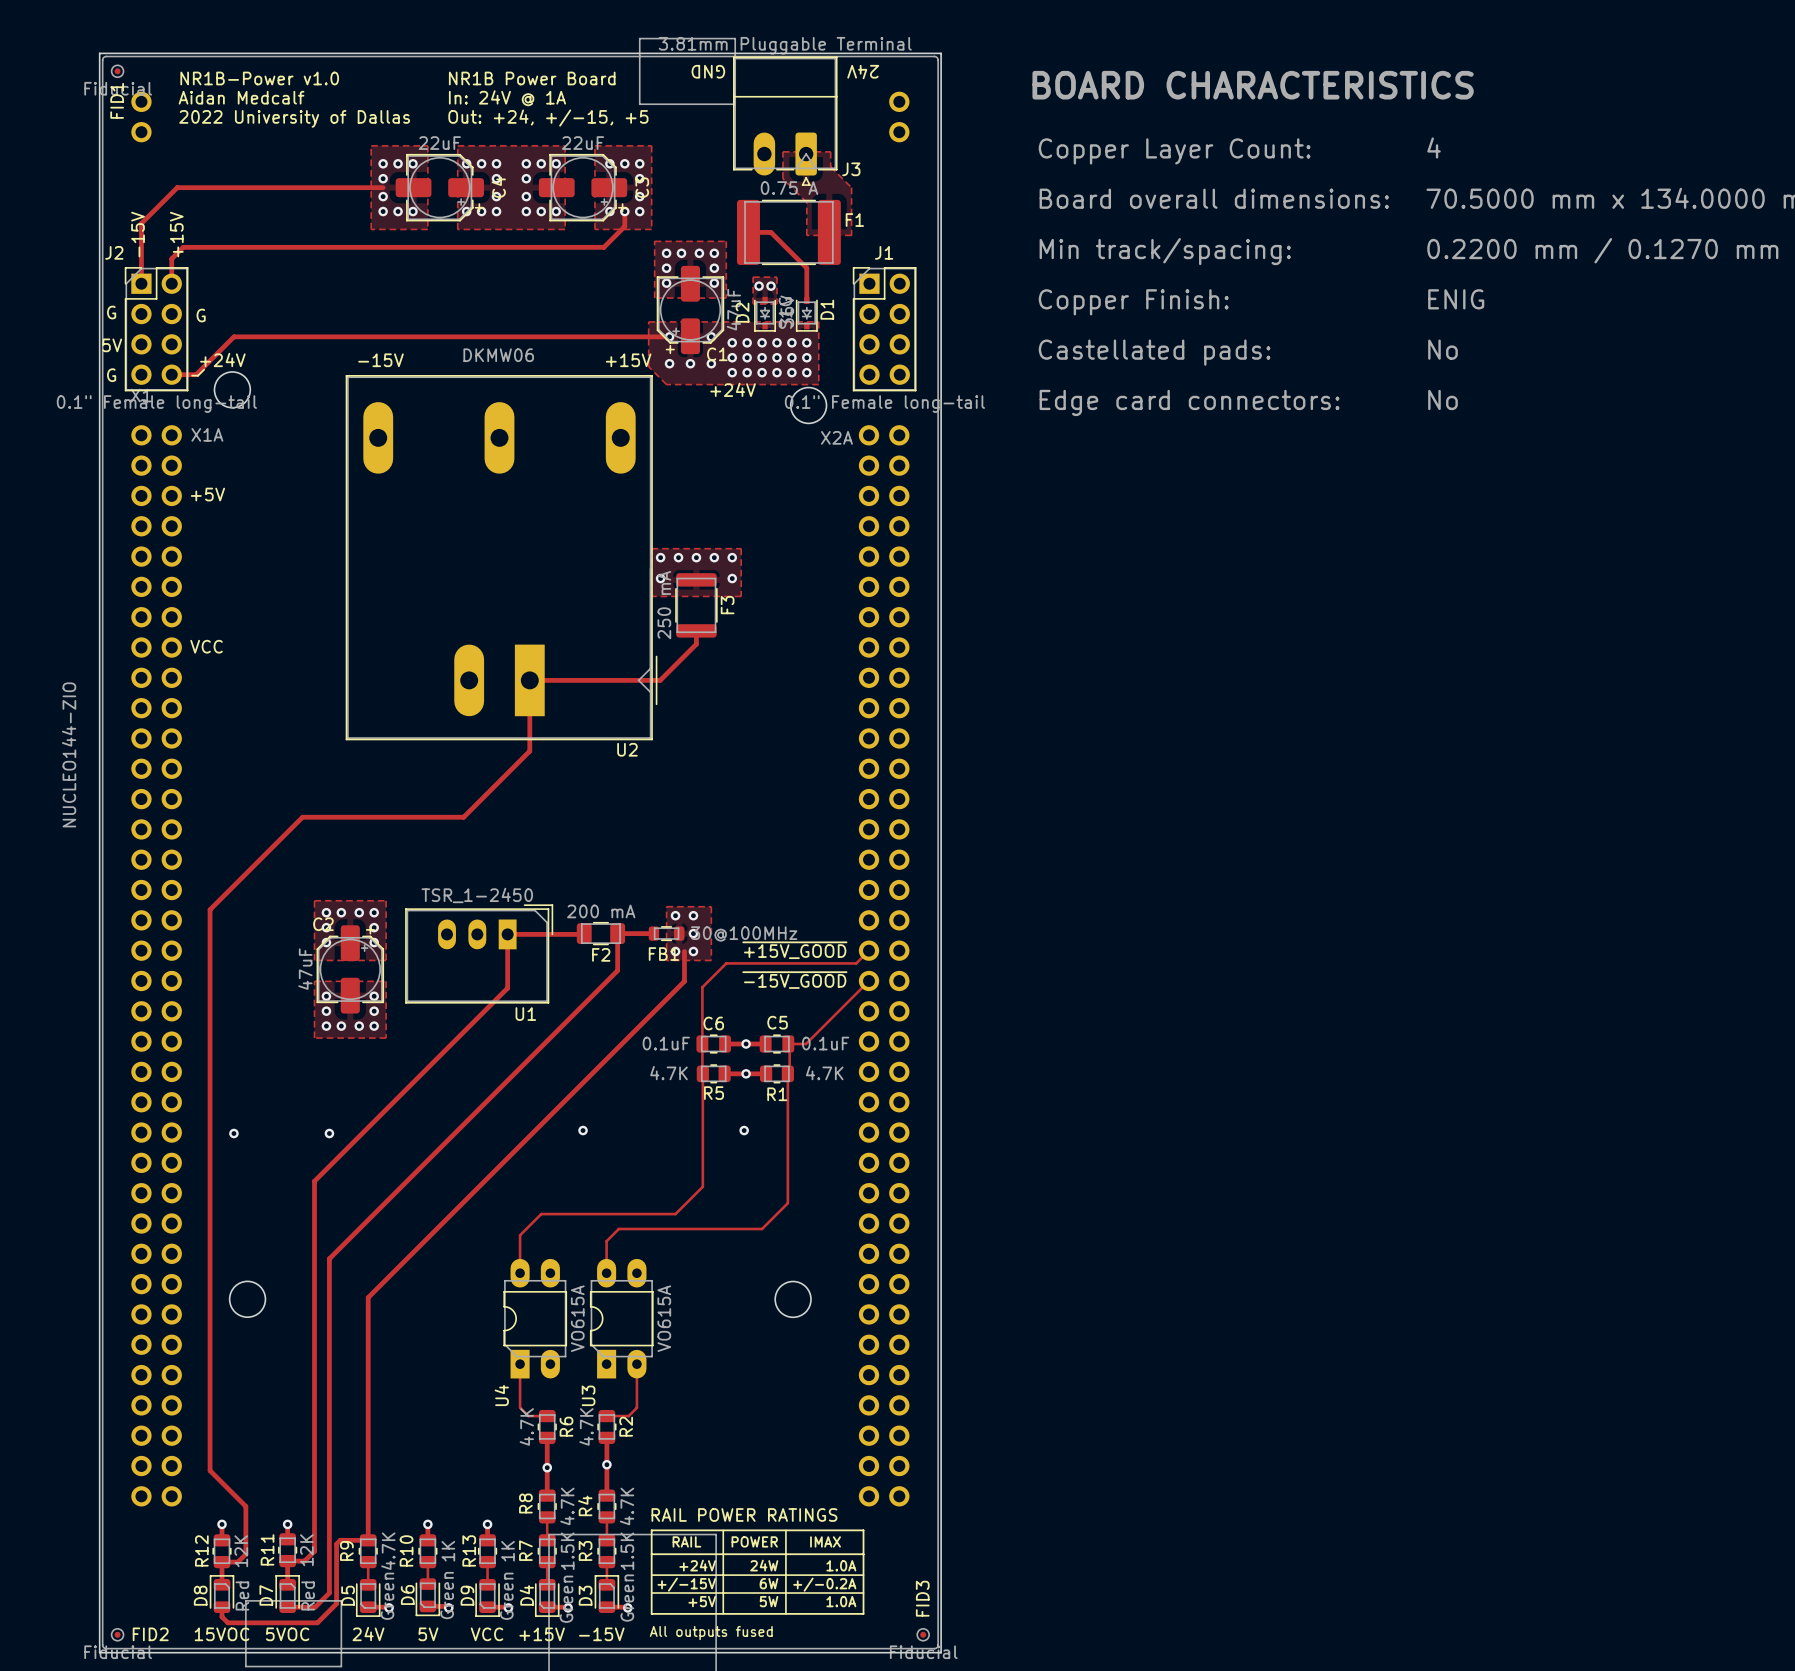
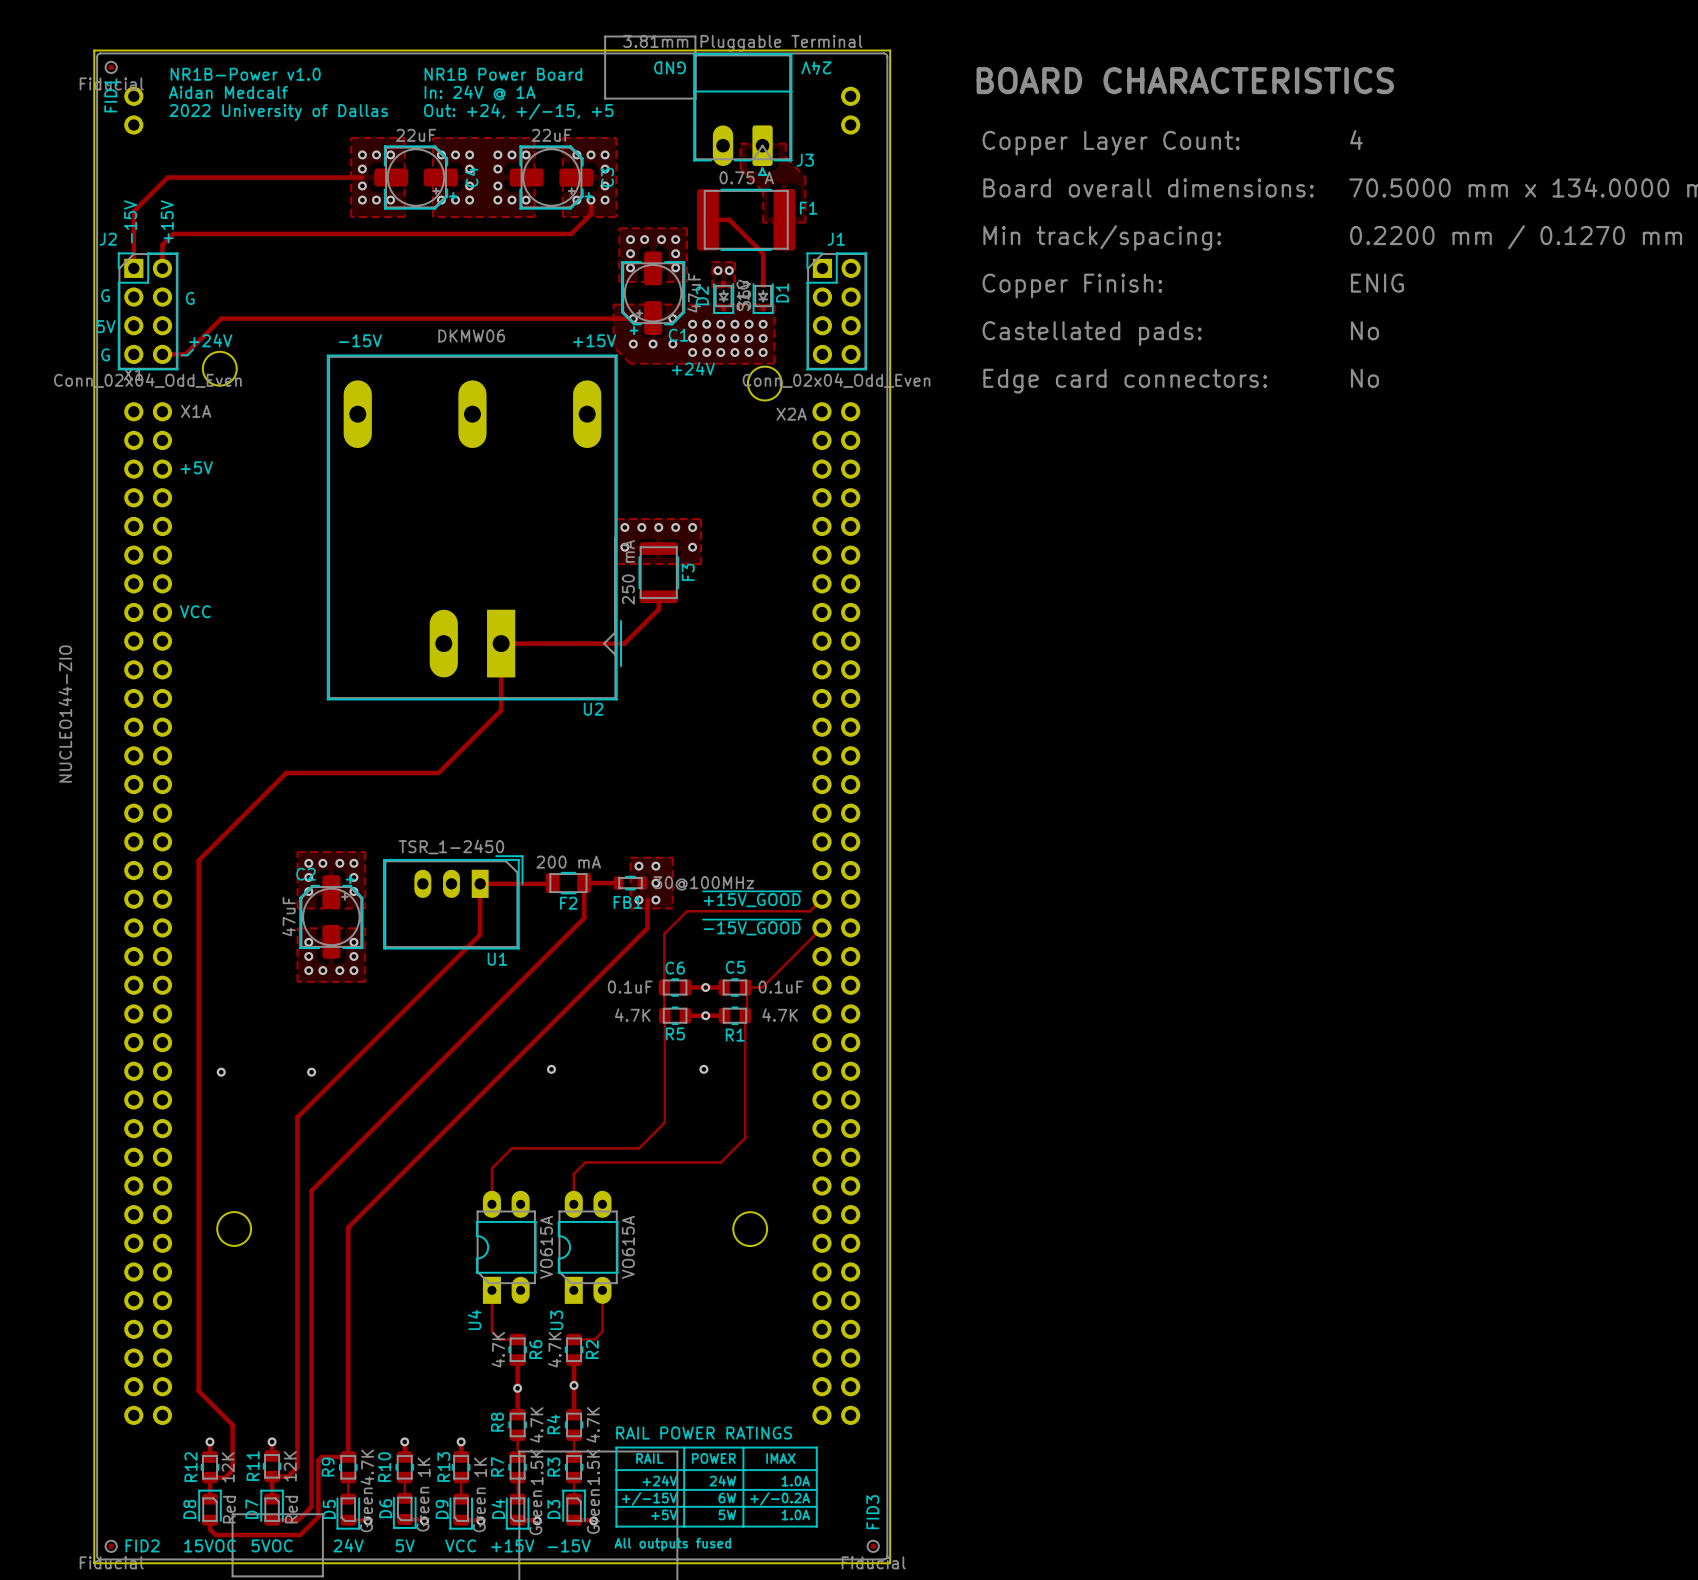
J2 value: 0.1" Female long-tail (156, 404) -> Conn_02x04_Odd_Even (147, 380)
J1 value: 0.1" Female long-tail (884, 404) -> Conn_02x04_Odd_Even (836, 380)

